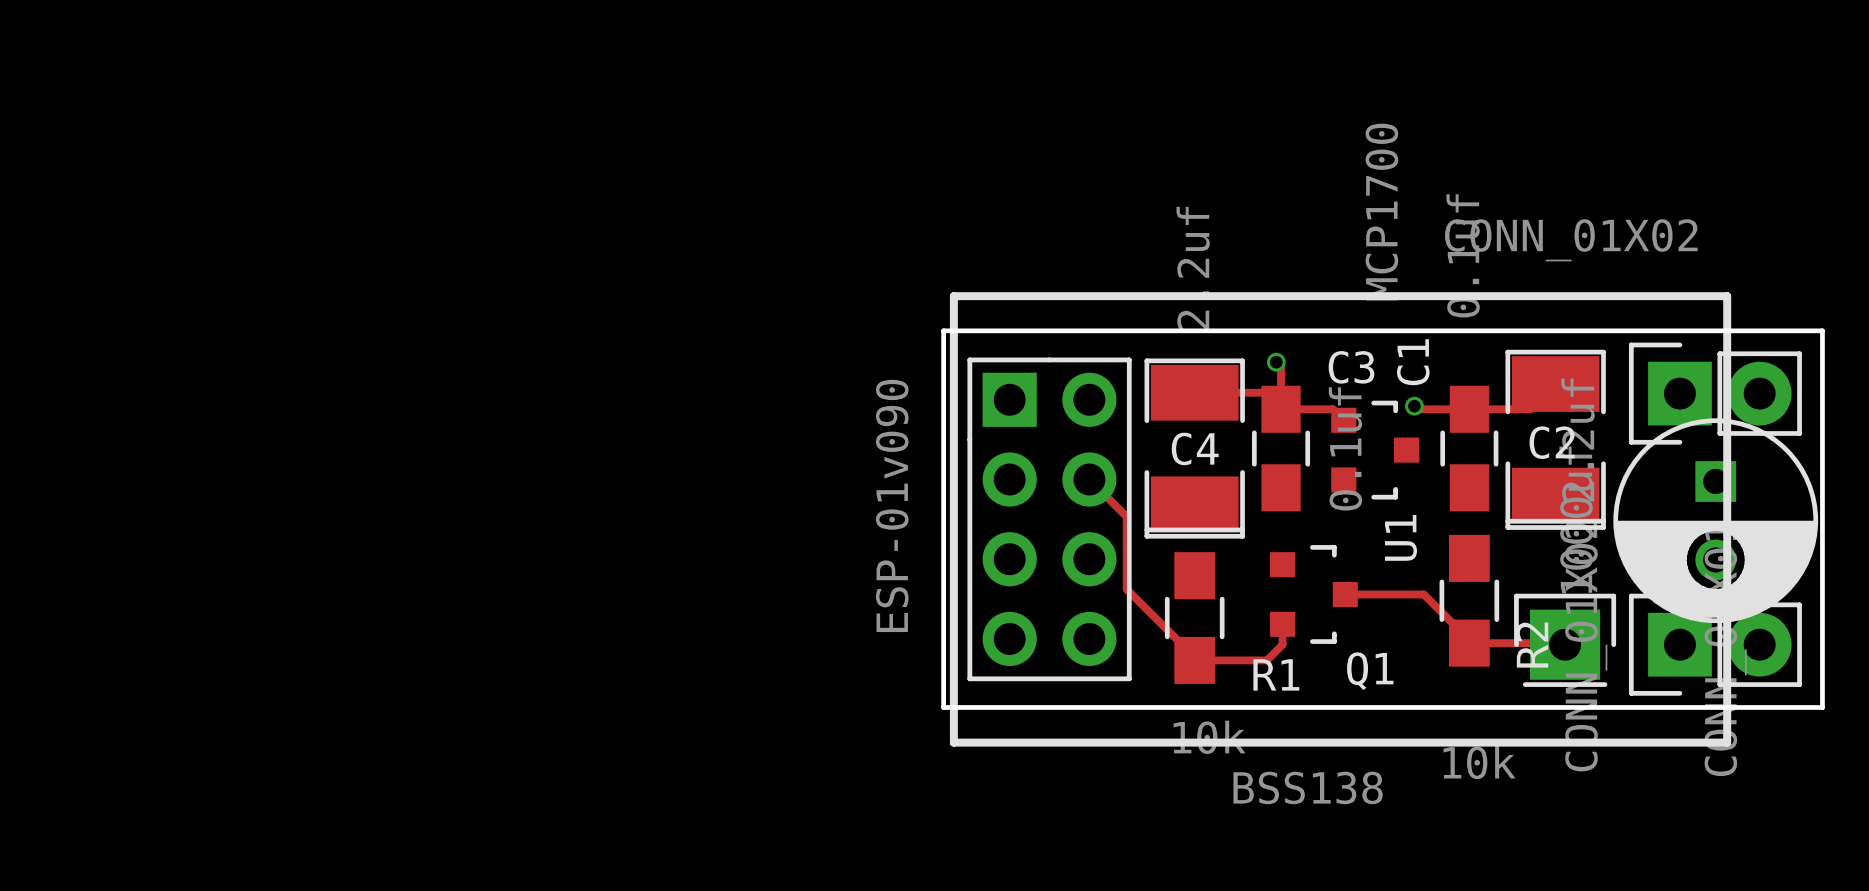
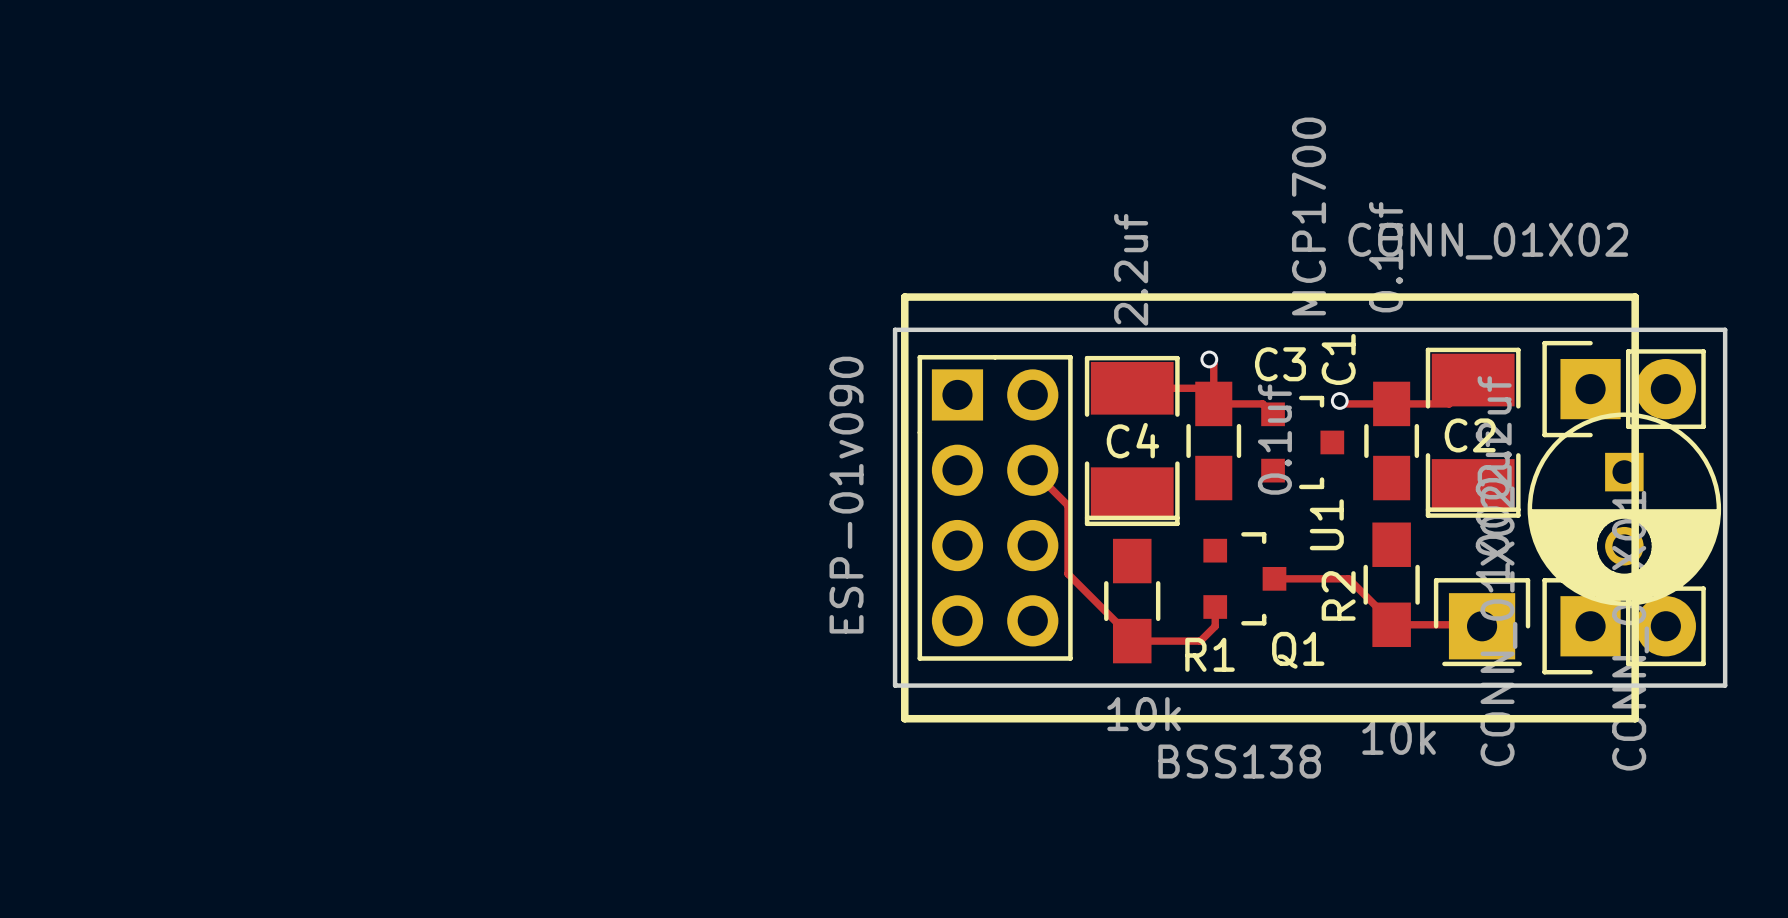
R2 name position: R2 (1532, 645) -> R2 (1338, 595)

